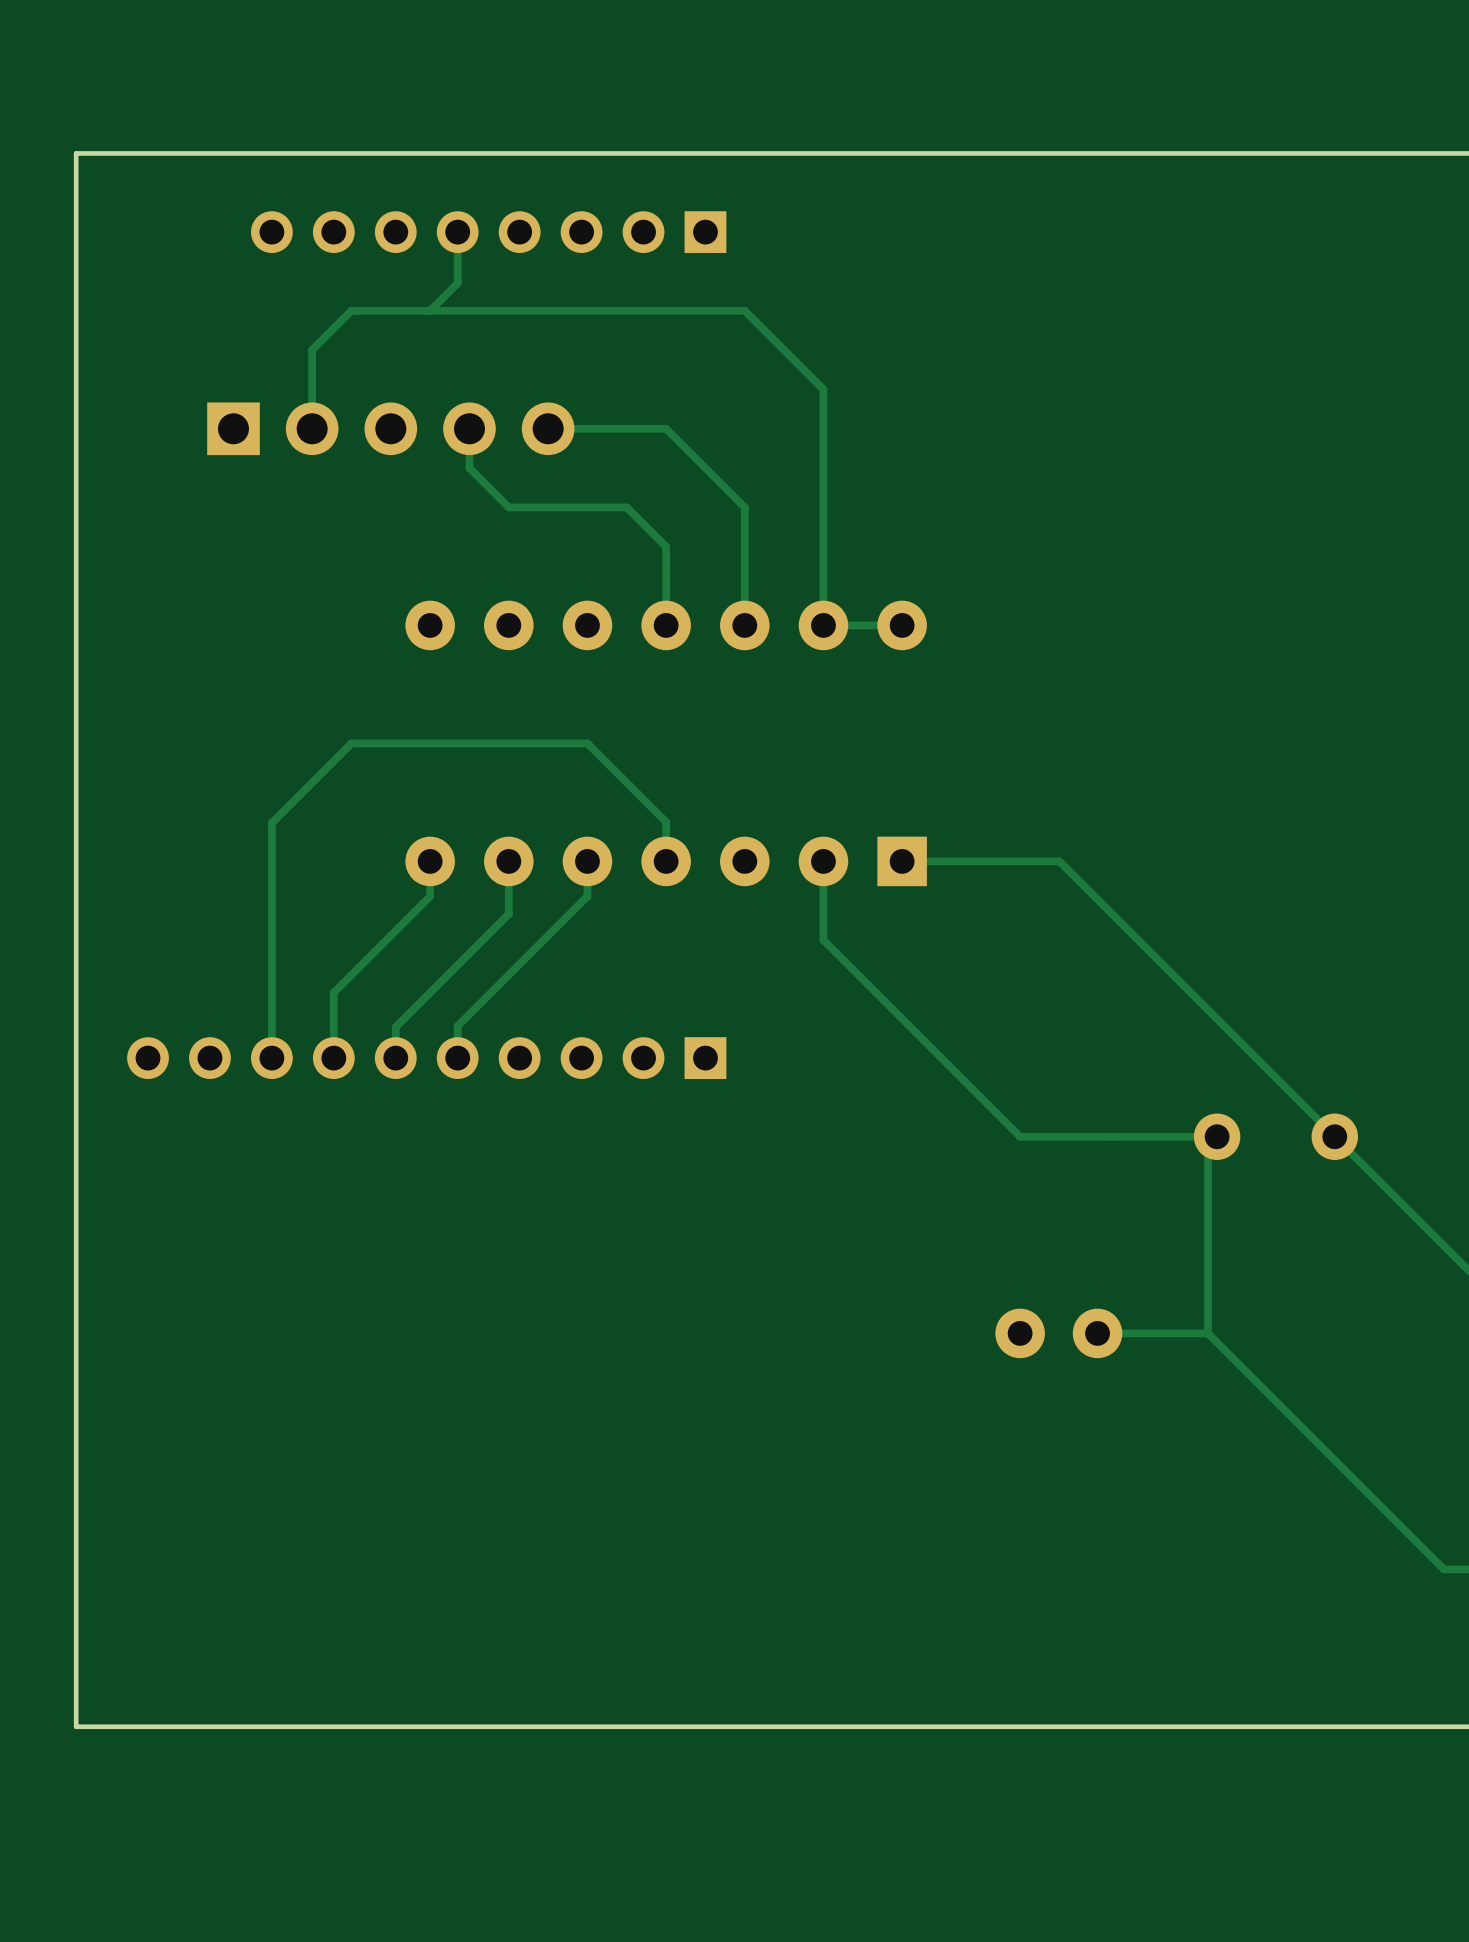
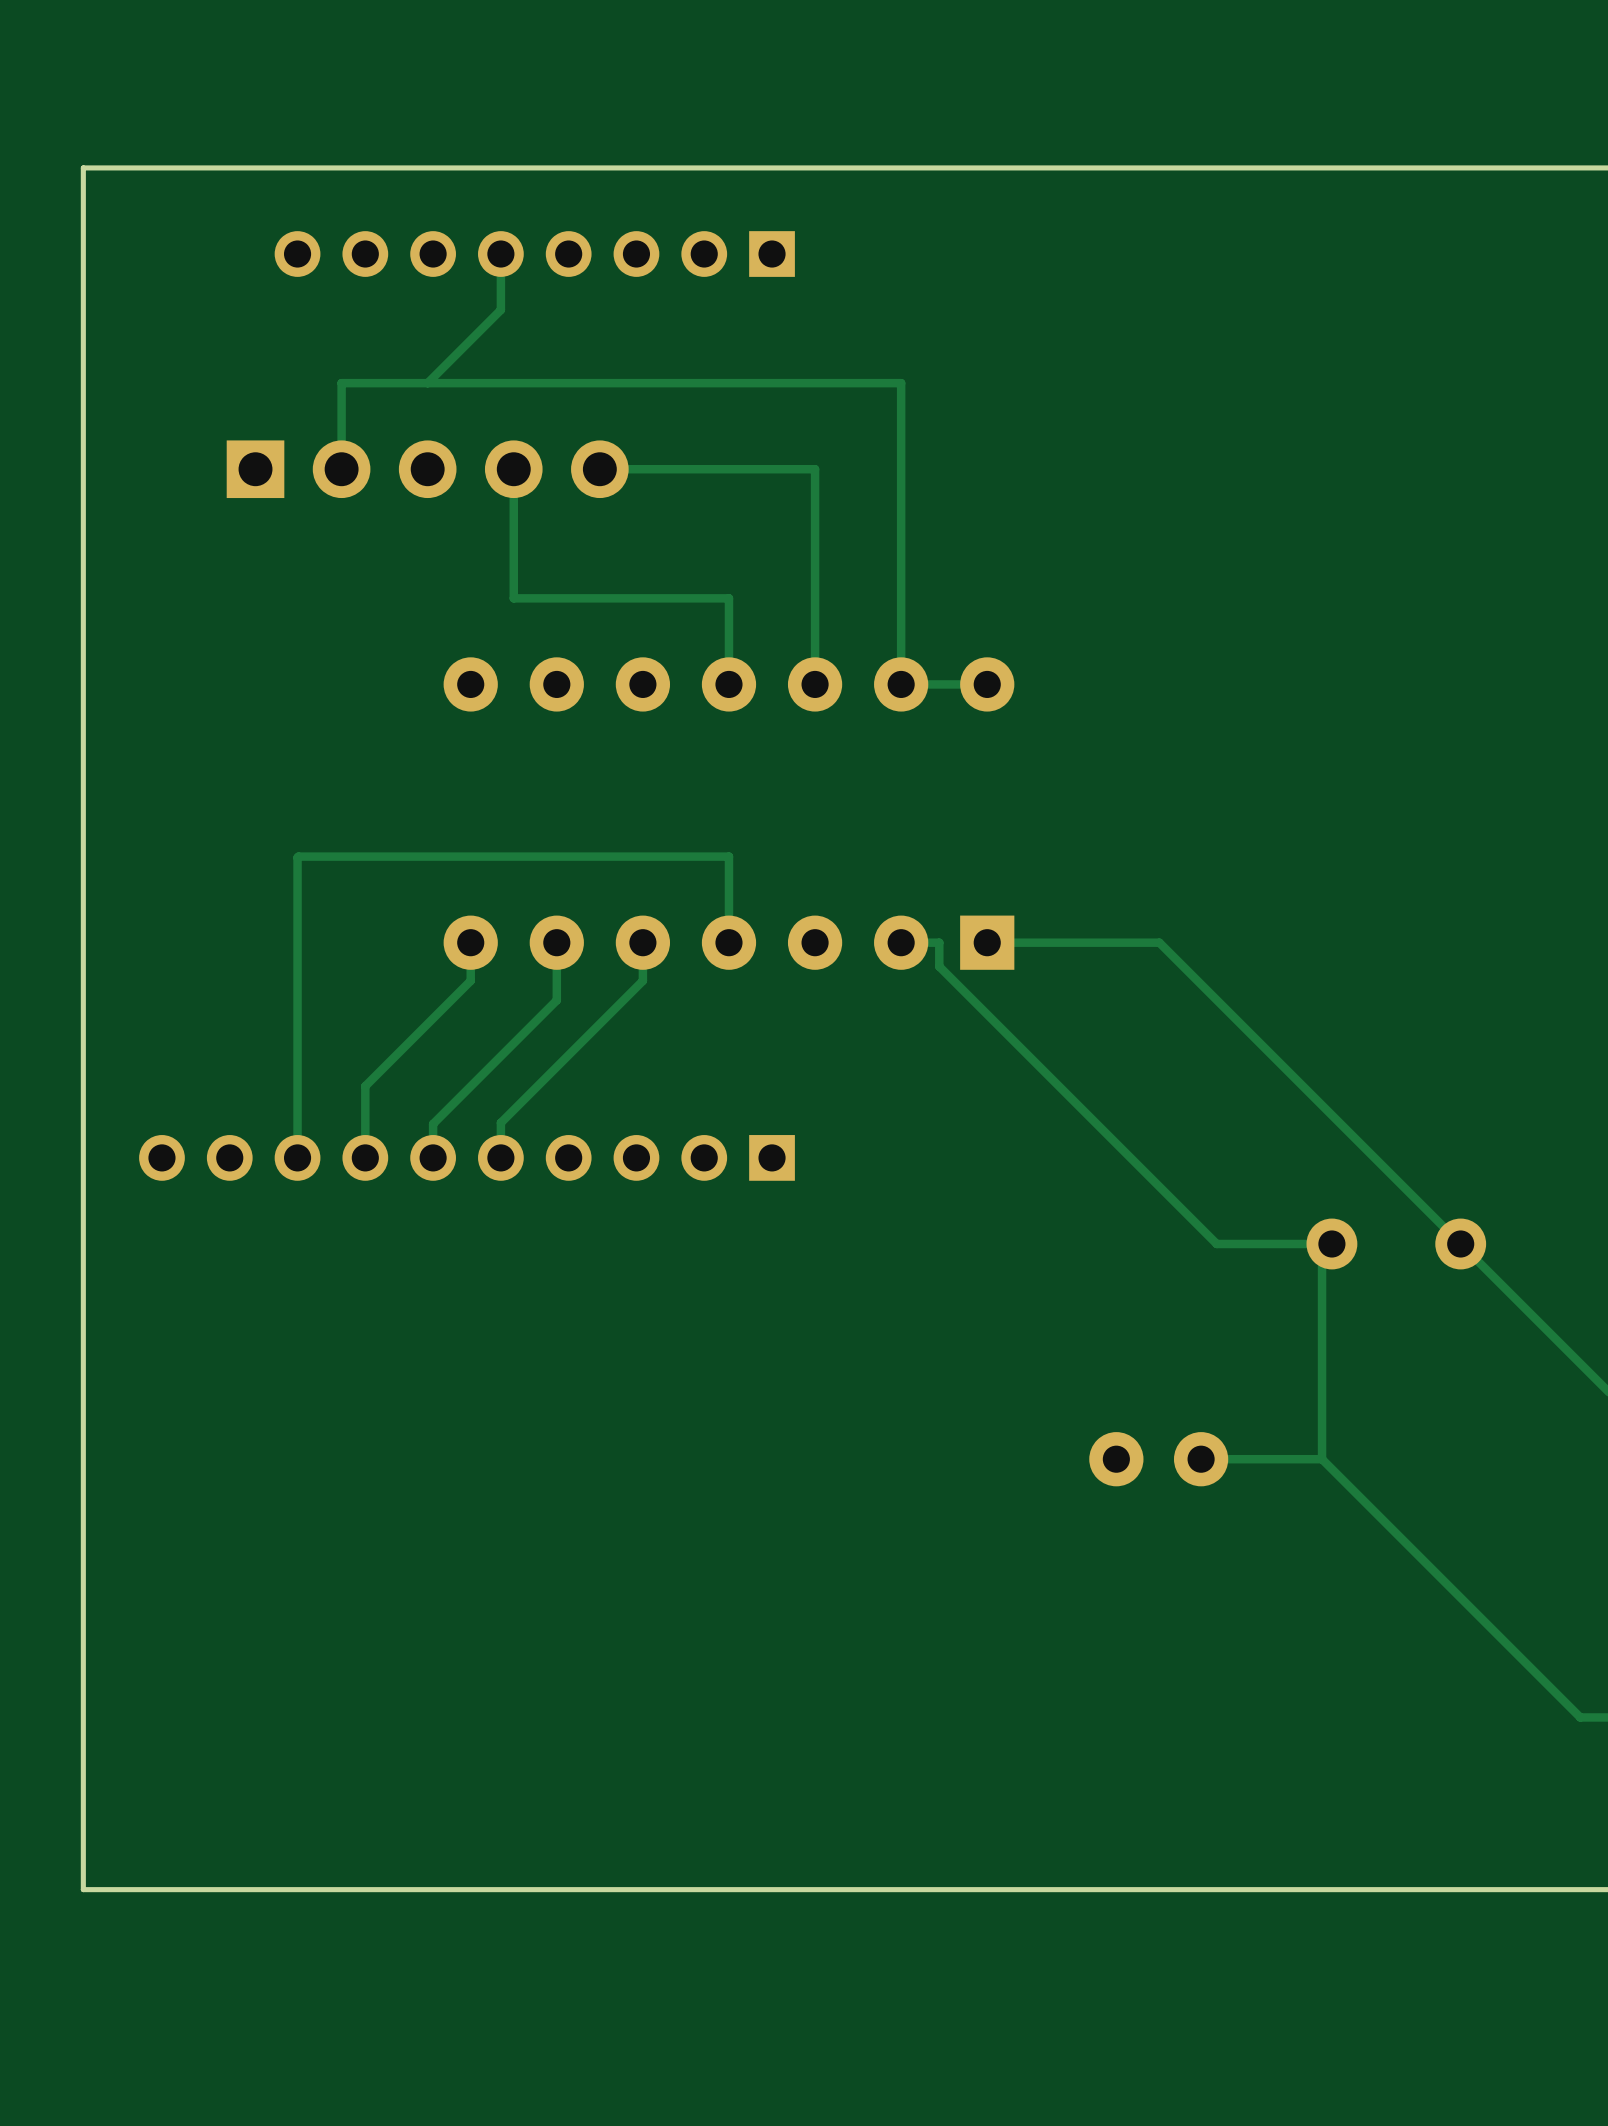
track: none -> (470, 340) (427, 383)
track: (312, 350) (351, 310) (744, 310) (823, 389) -> (341, 383) (901, 383) (901, 426)
track: (666, 428) (744, 507) -> (728, 469) (815, 469) (815, 555)
track: (469, 468) (508, 507) (626, 507) (666, 546) -> (513, 512) (513, 598) (728, 598)
track: (666, 822) (587, 743) (351, 743) (271, 823) -> (728, 899) (728, 856) (298, 856) (297, 900)
track: (823, 861) (823, 940) (1020, 1136) (1111, 1136) -> (901, 942) (939, 942) (939, 966) (1216, 1243)

